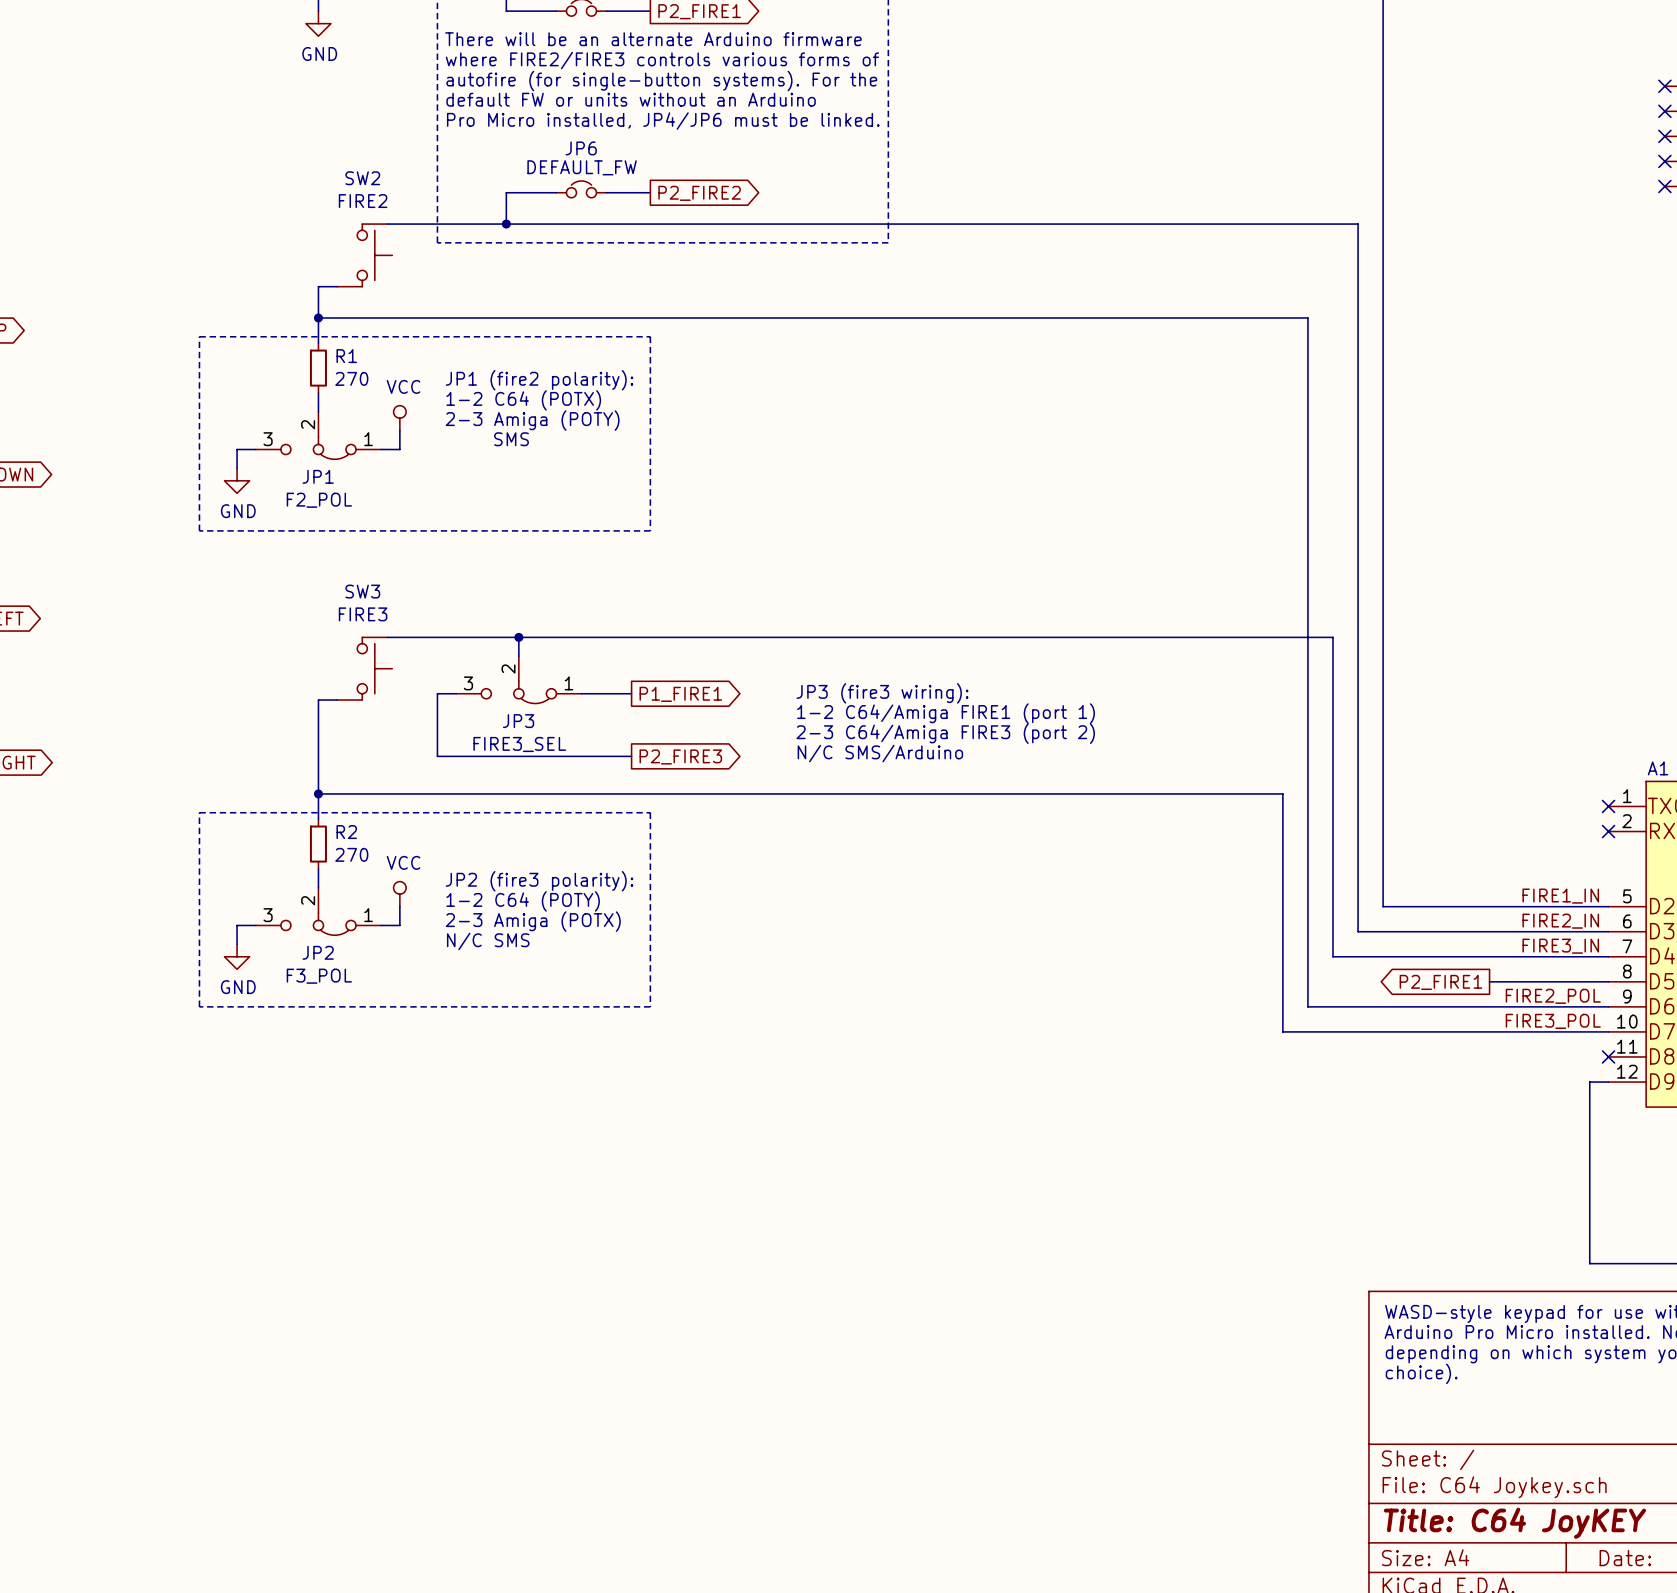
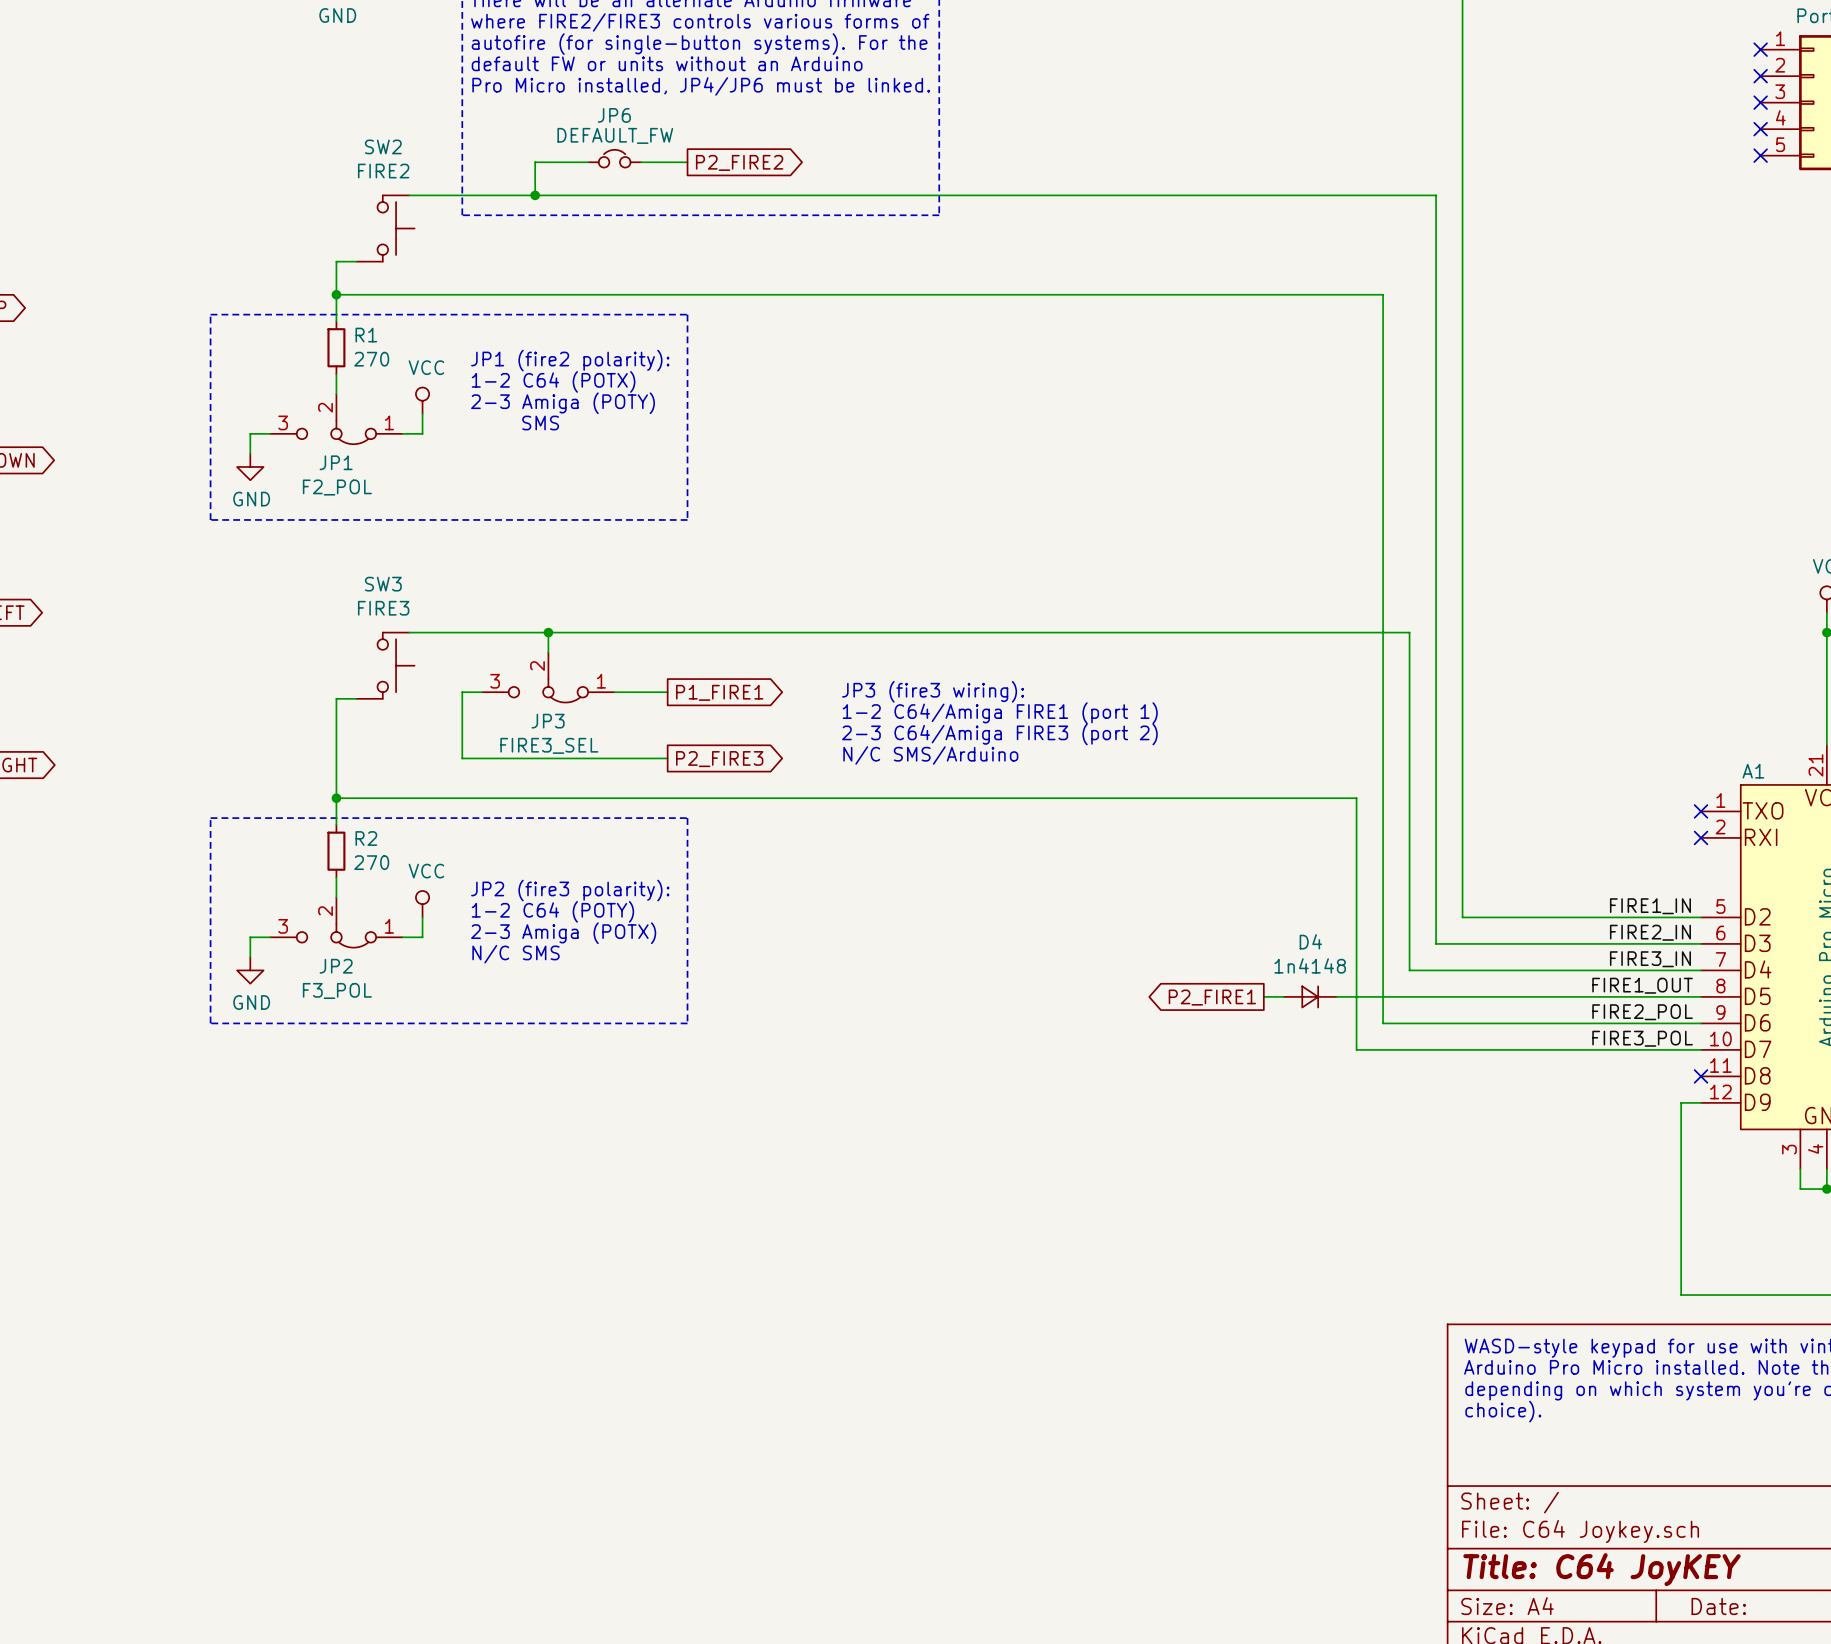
label: none -> FIRE1_OUT (1642, 985)
wire: none -> (1263, 996) (1283, 996)
D4: none -> 1n4148 (1310, 996)
wire: none -> (1336, 996) (1575, 996)
global label: none -> P2_FIRE1 (1212, 997)
global label: P2_FIRE1 (1440, 982) -> none

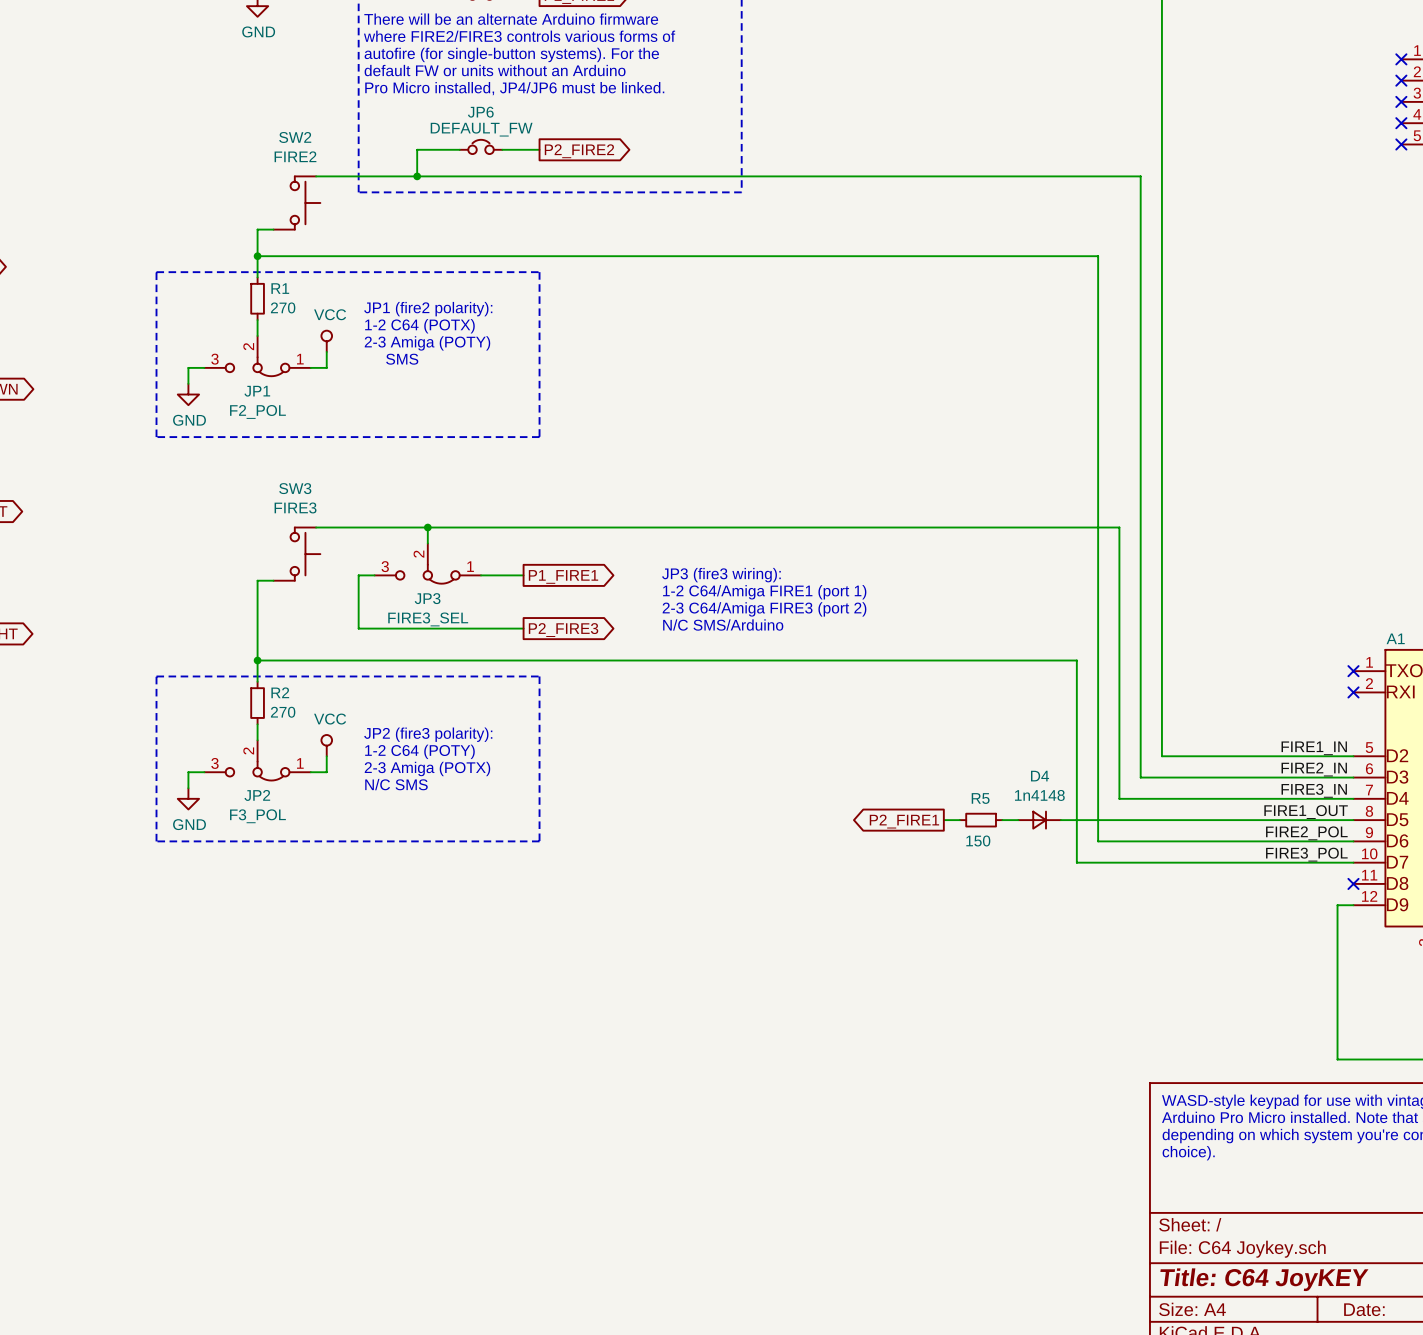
wire: none -> (943, 820) (959, 820)
R5: none -> 150 (981, 820)
global label position: P2_FIRE1 (1212, 997) -> P2_FIRE1 (904, 821)

